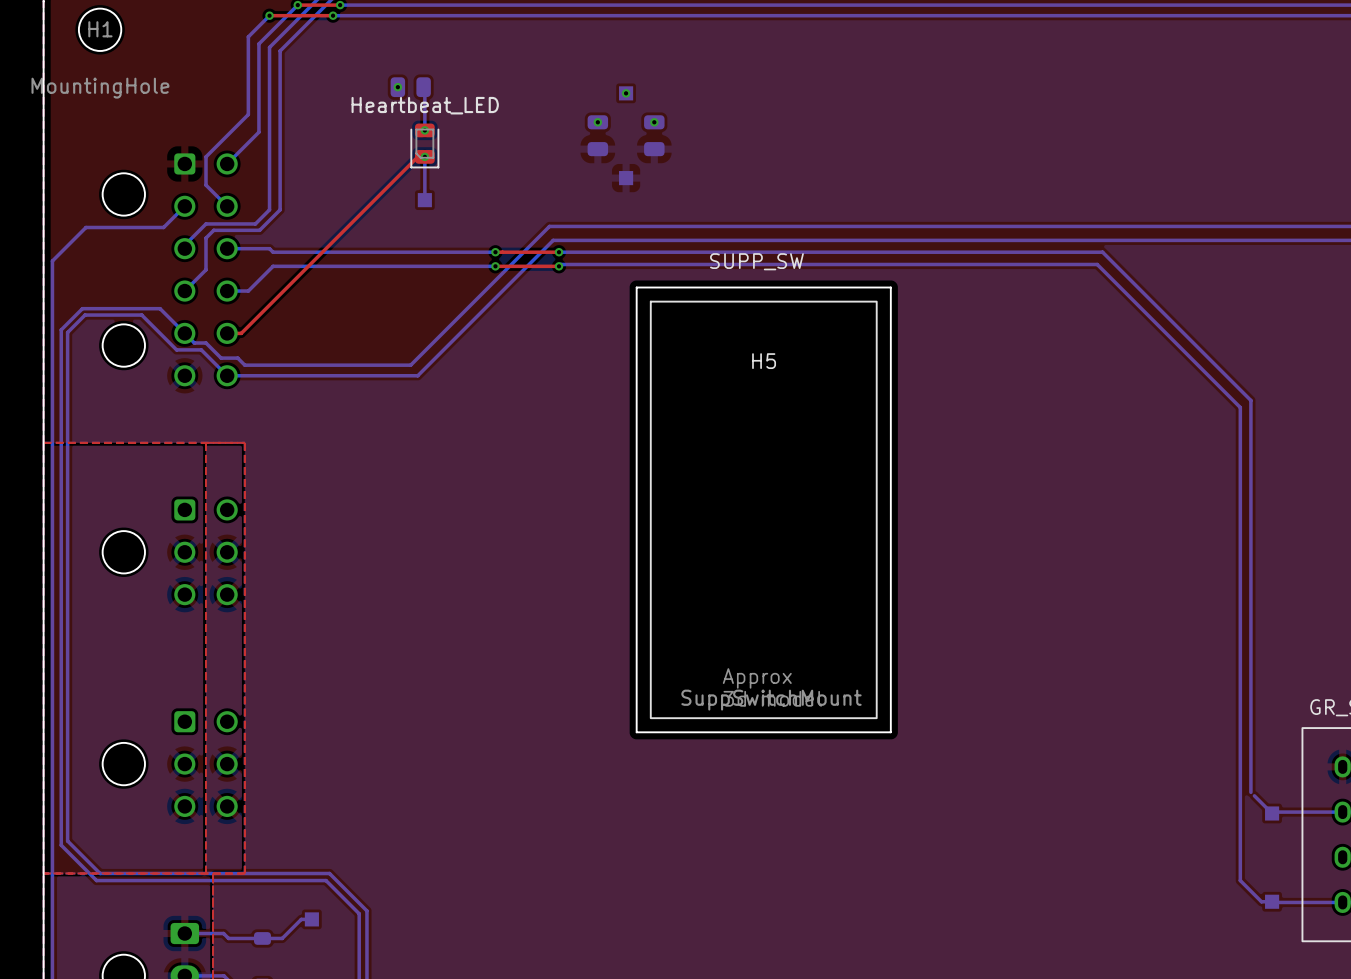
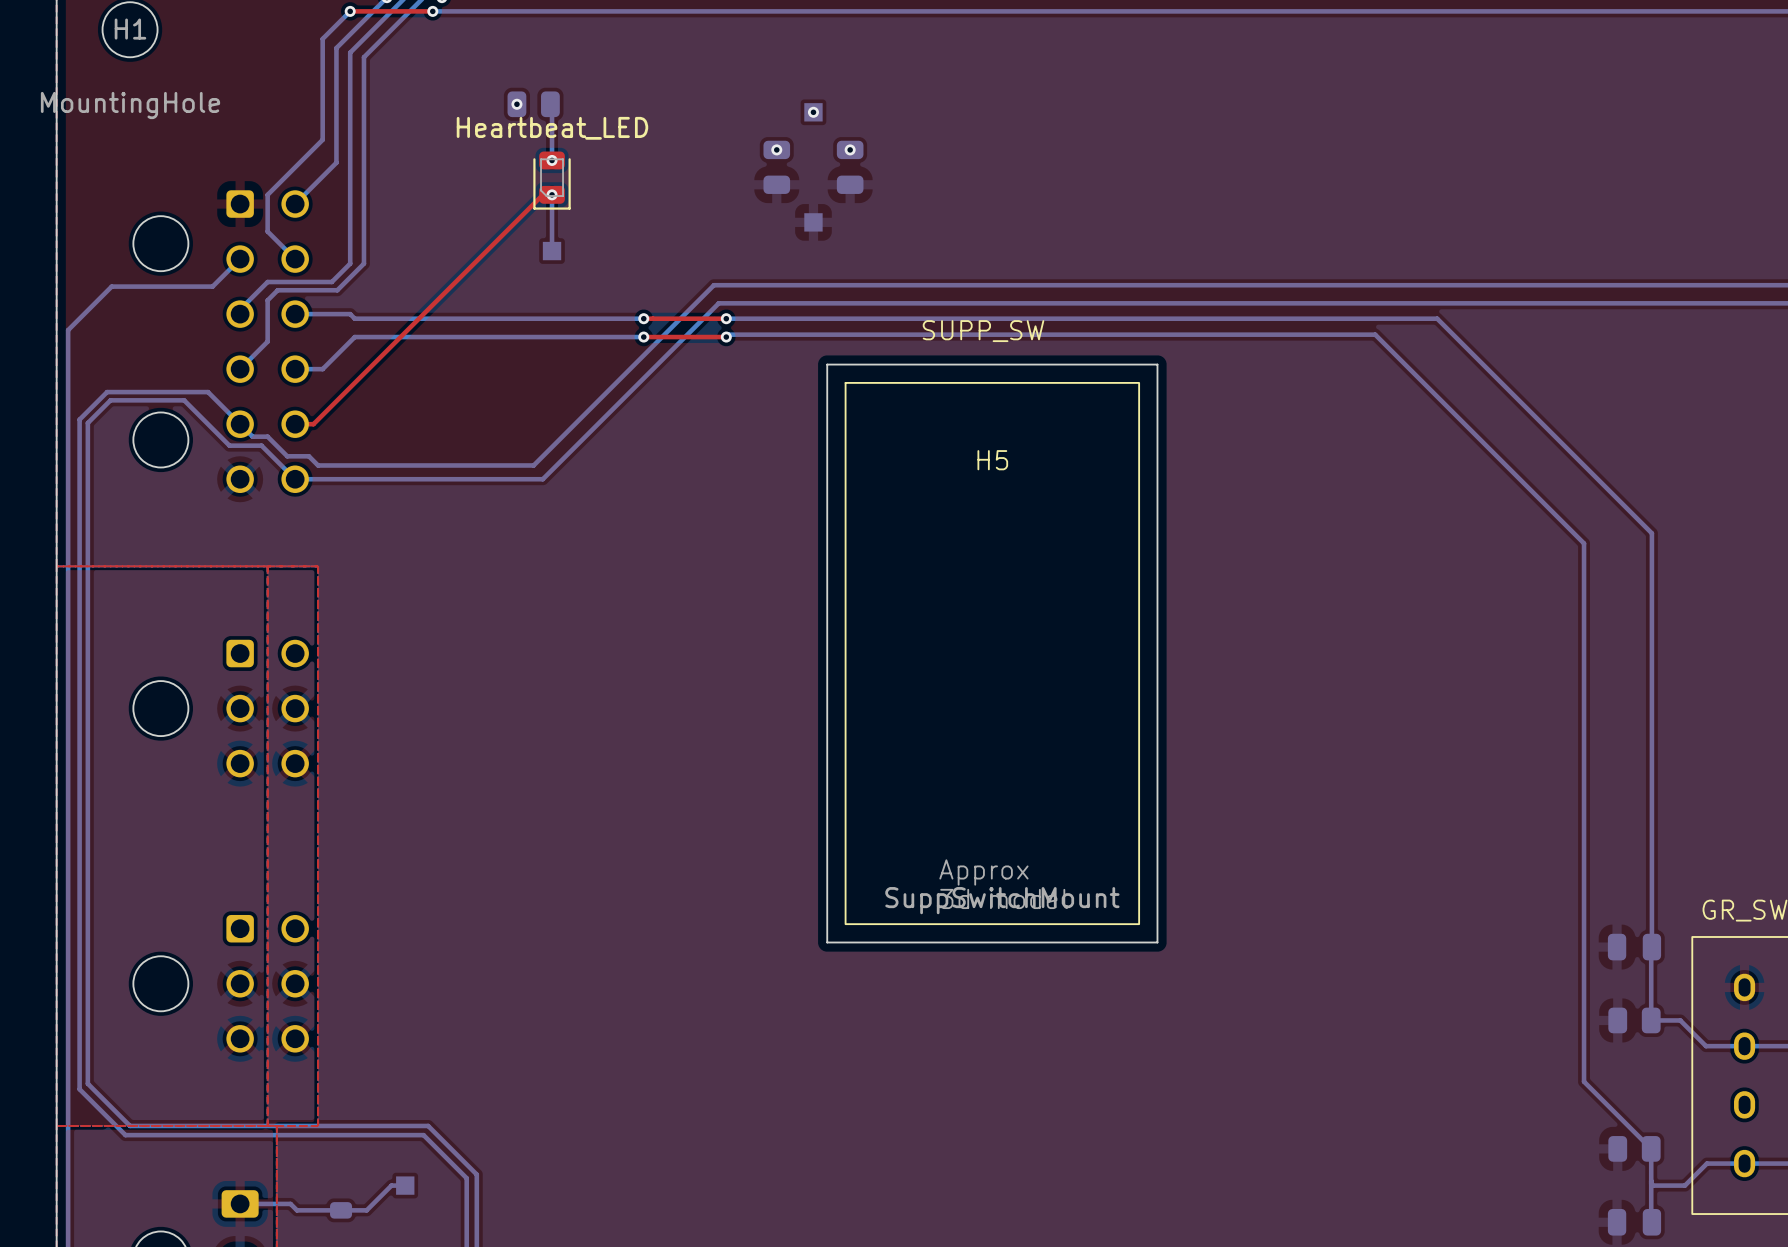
bottom track: (1102, 252) (1250, 400) (1250, 792) -> (1432, 318) (1437, 318) (1651, 533) (1651, 1020) (1680, 1020) (1706, 1046)
bottom track: (1058, 264) (1097, 264) (1240, 407) (1240, 880) (1261, 901) (1313, 902) -> (1375, 334) (1584, 543) (1584, 1081) (1651, 1148) (1651, 1222)
part: none -> (1634, 947)
part: none -> (1634, 1020)
bottom track: (1254, 795) (1272, 813) (1313, 812) -> none
part: (1272, 813) -> none
part: none -> (1634, 1148)
part: (1272, 901) -> none
bottom track: none -> (1706, 1163) (1684, 1185) (1652, 1185) (1651, 1183)
part: none -> (1634, 1222)

